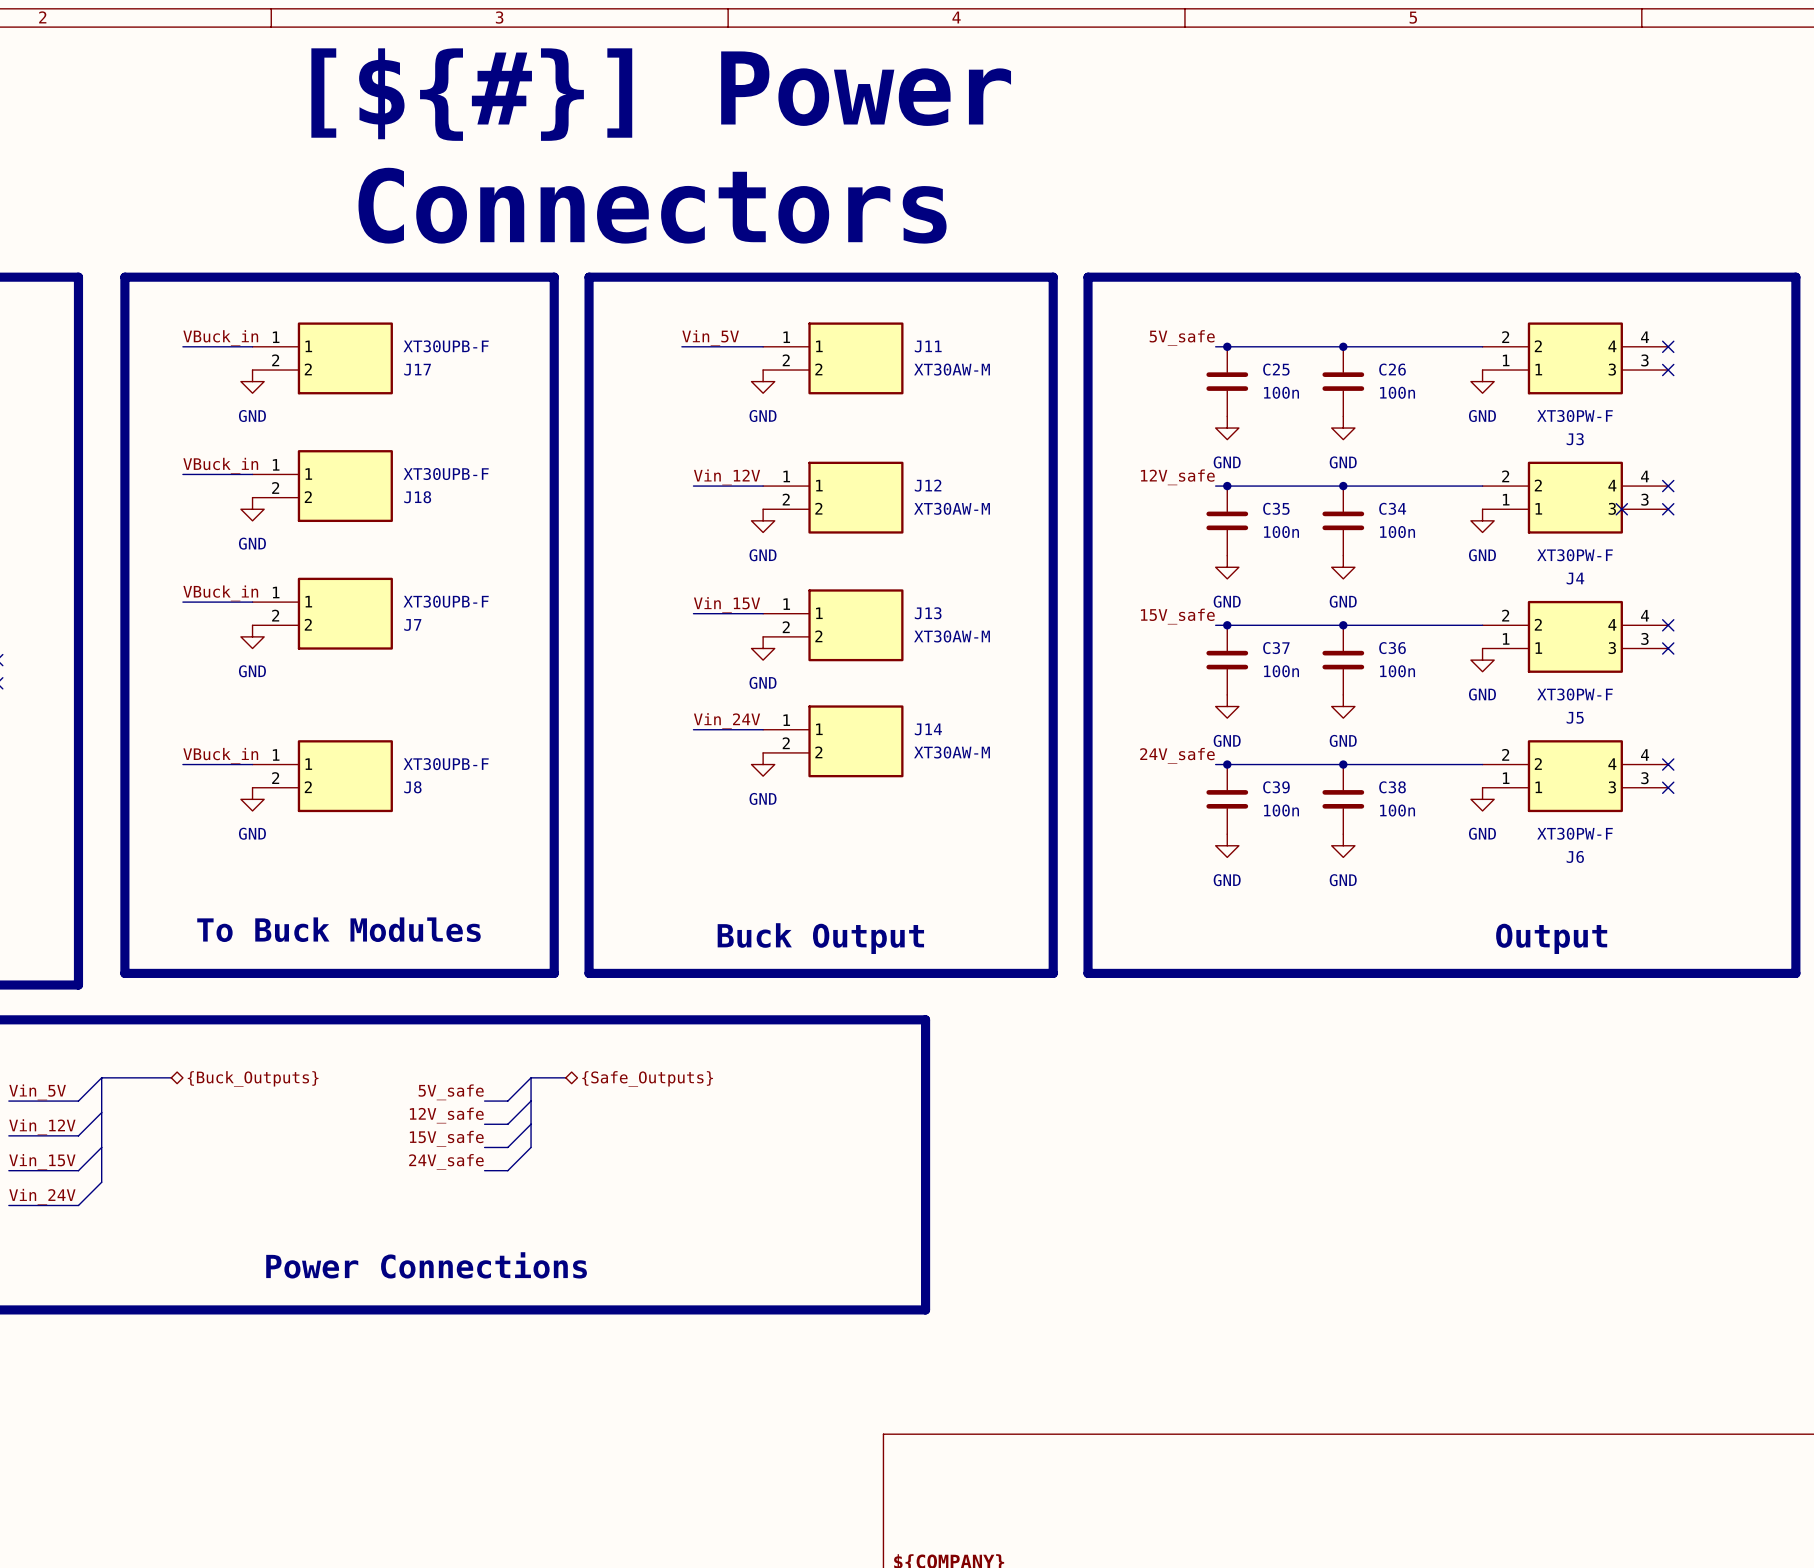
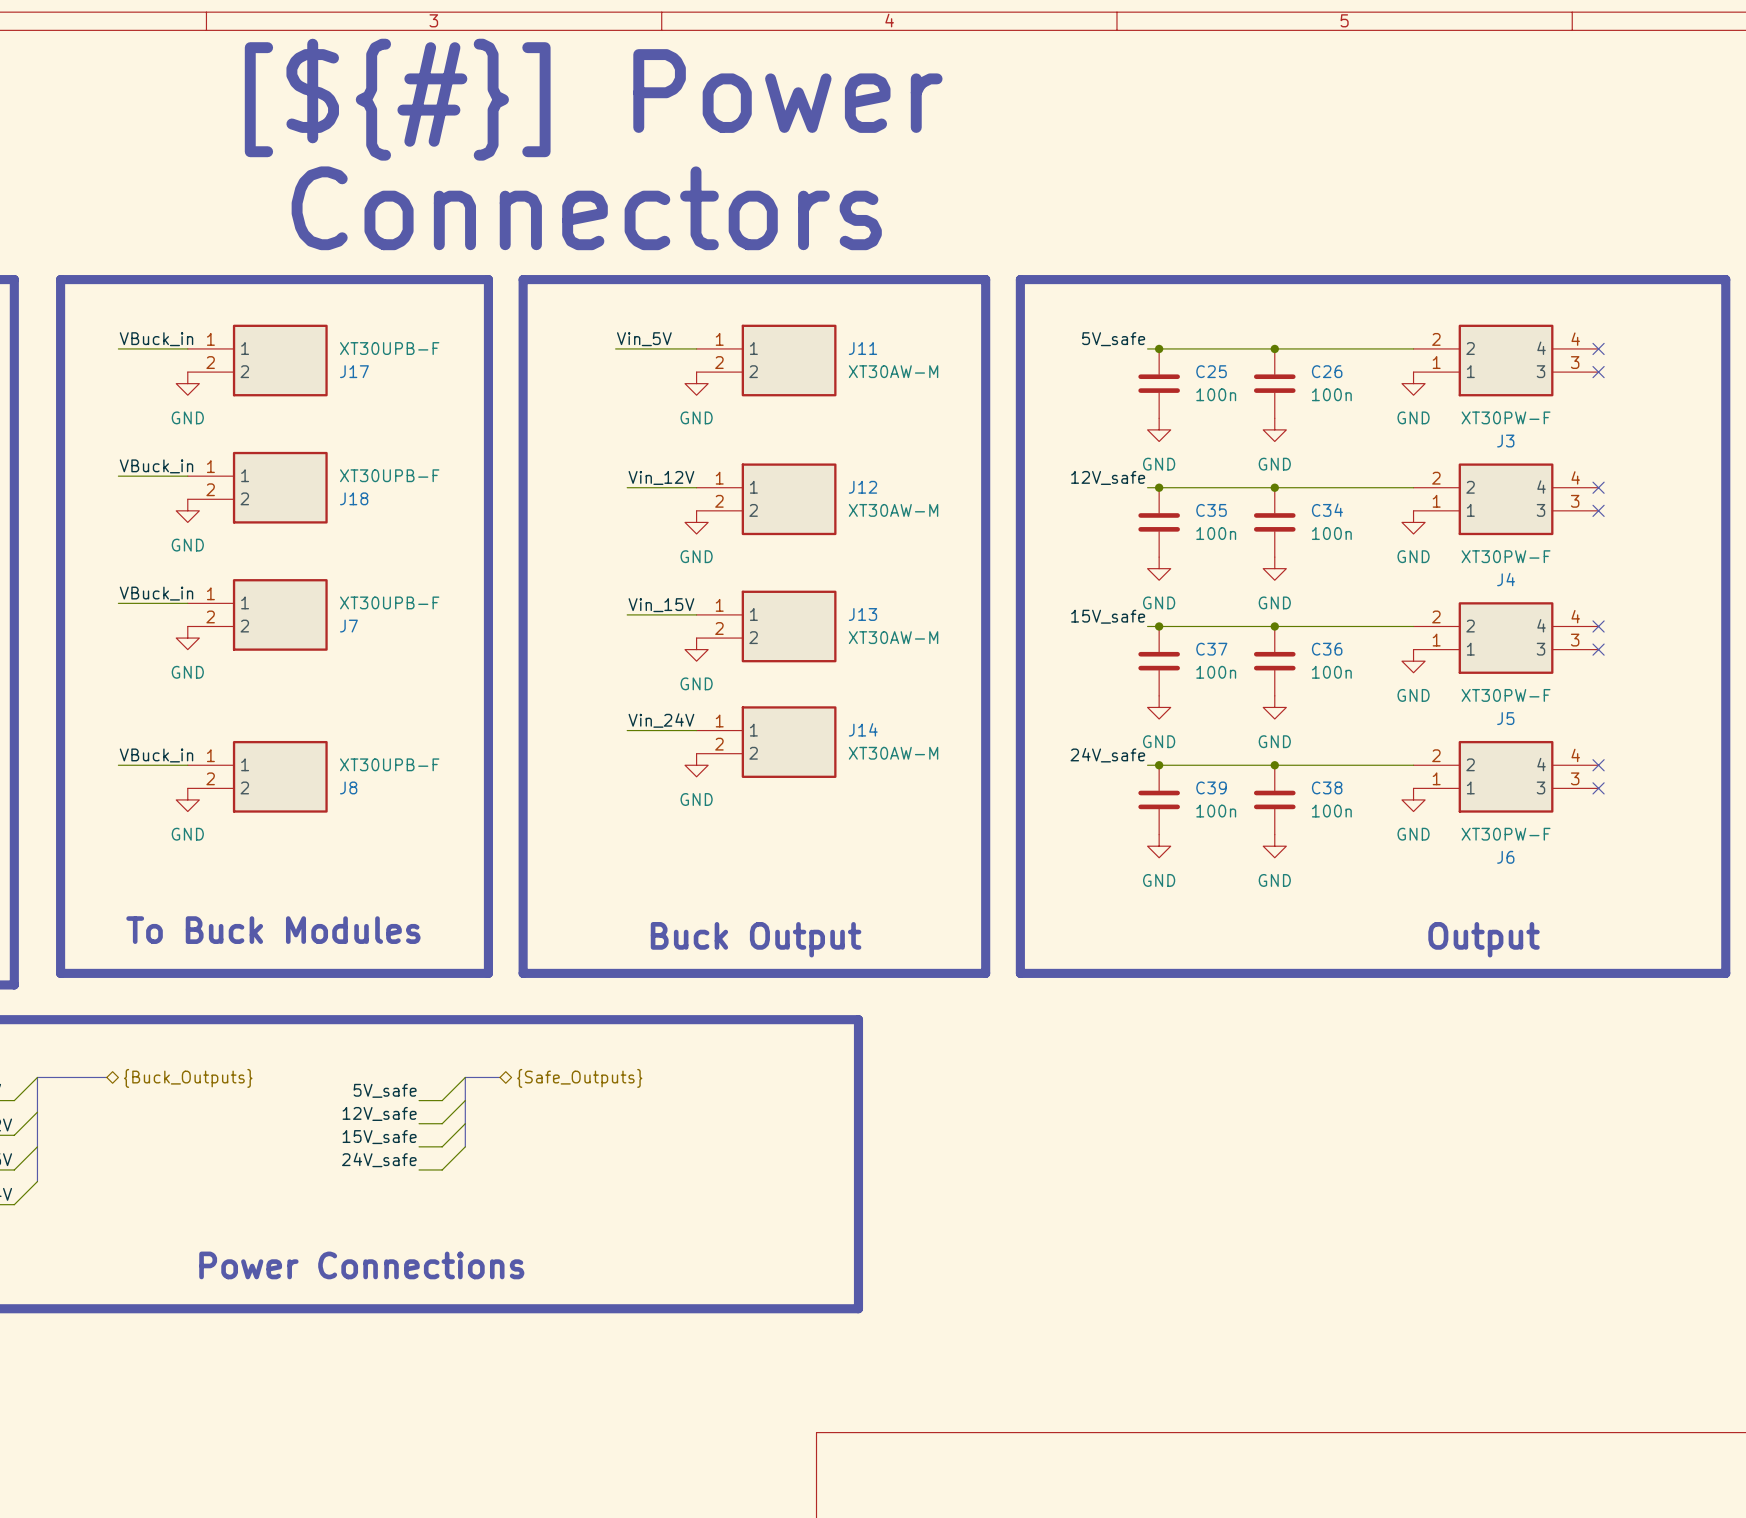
no-connect mark: (1621, 509) -> none

